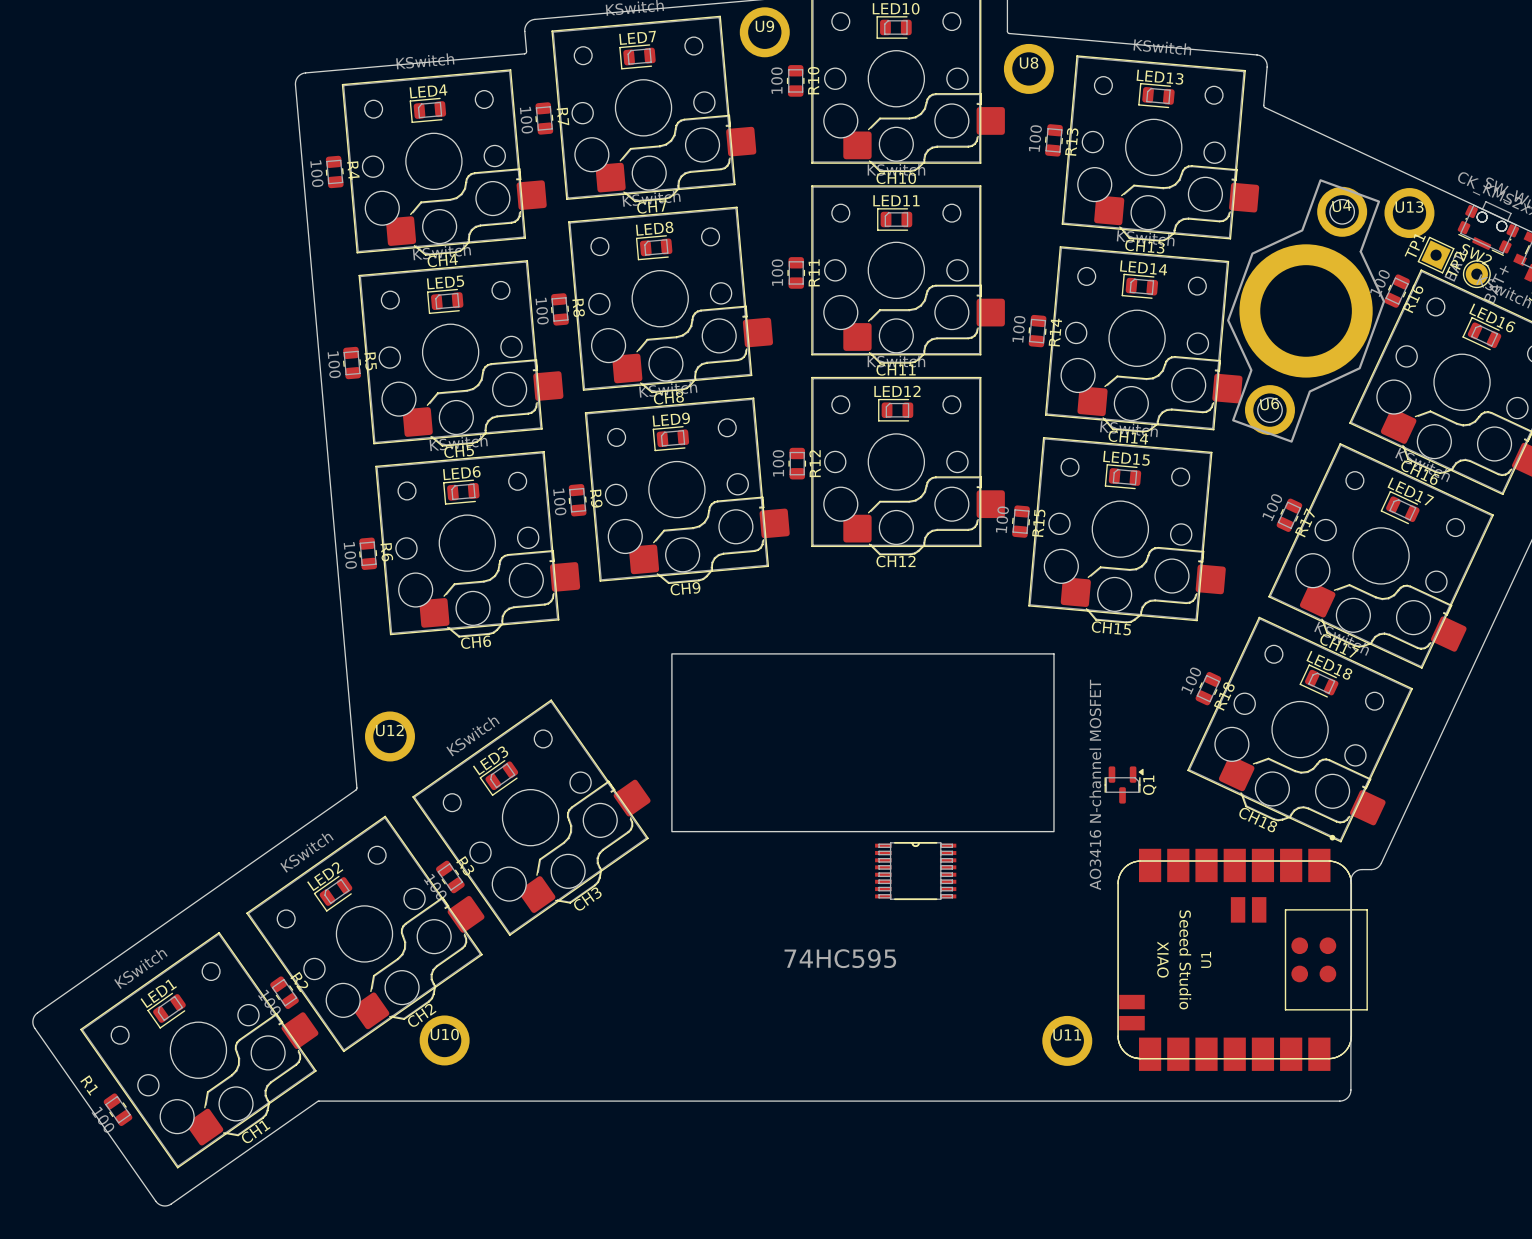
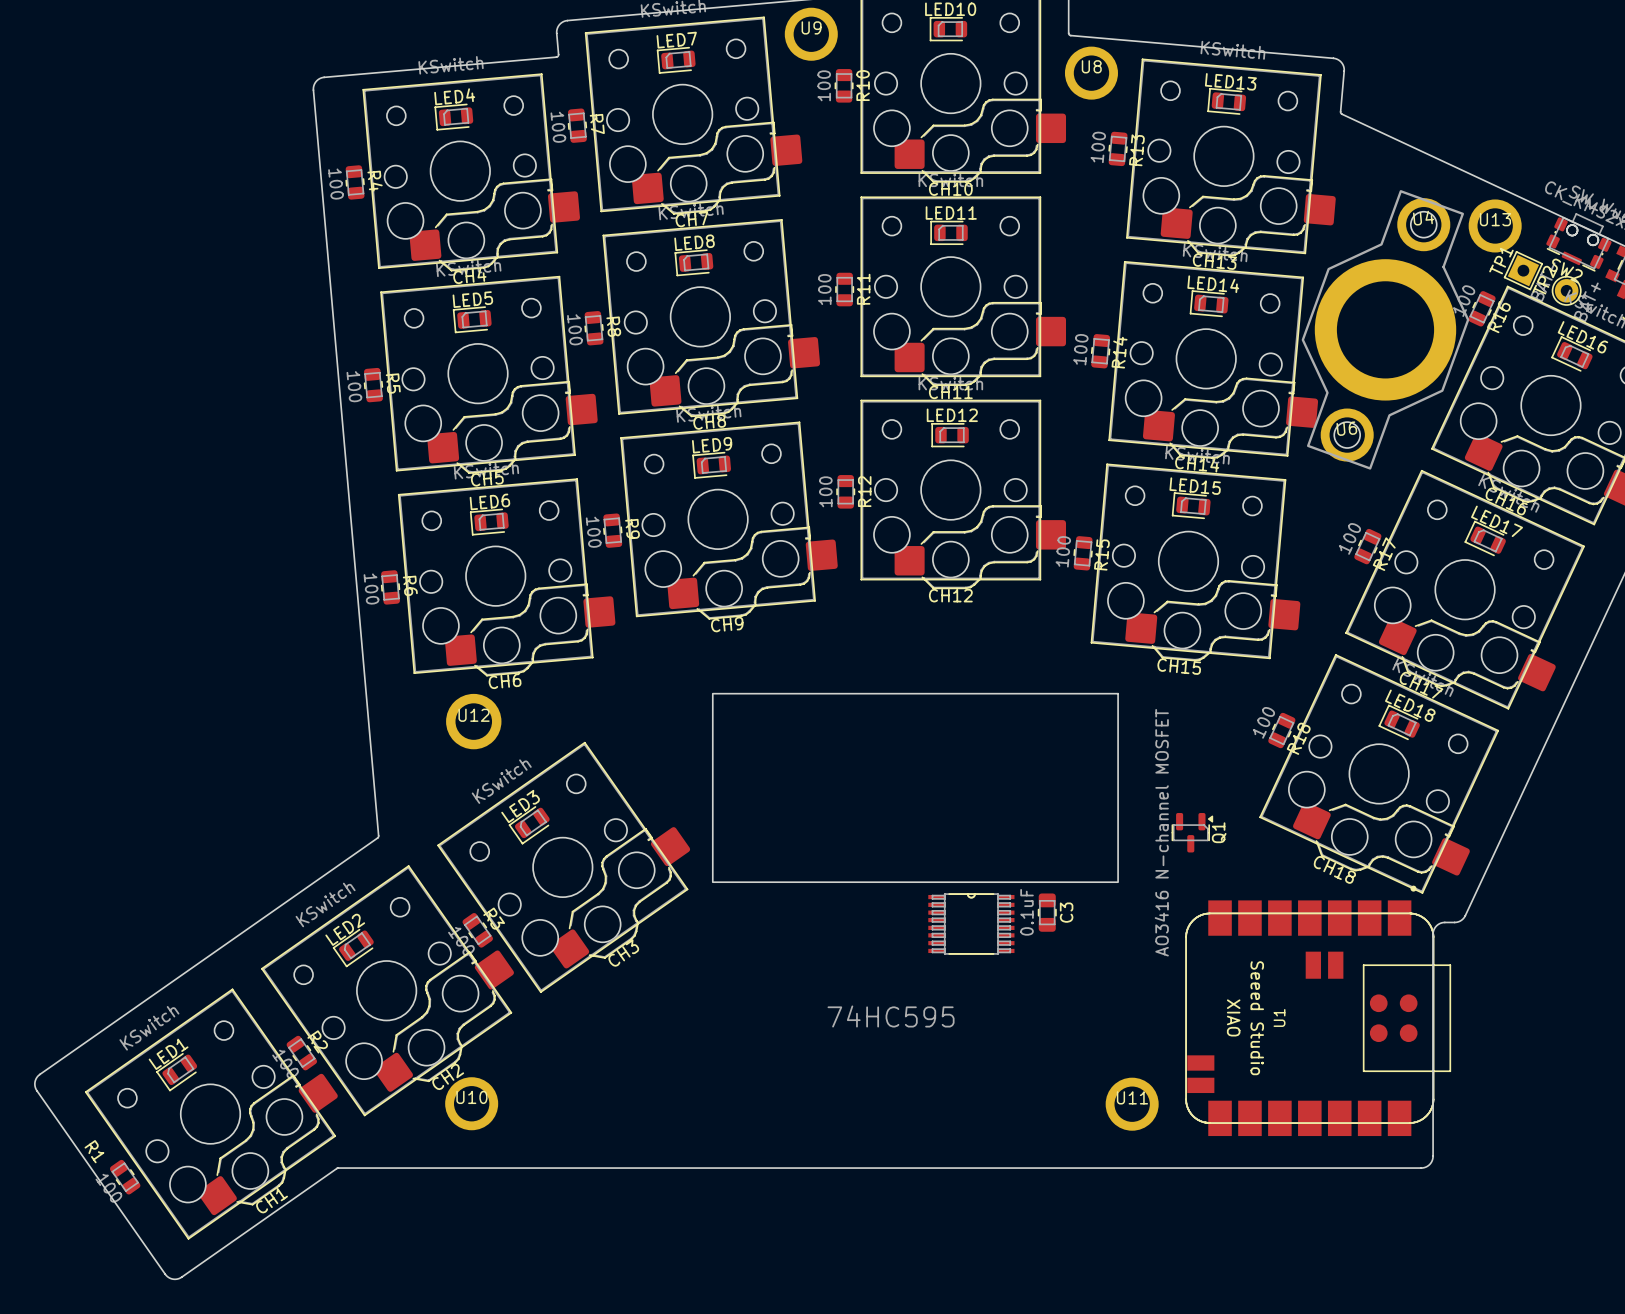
U12 footprint: [365, 711, 415, 762] -> [446, 693, 502, 750]
C3: none -> 0.1uF (1047, 912)

